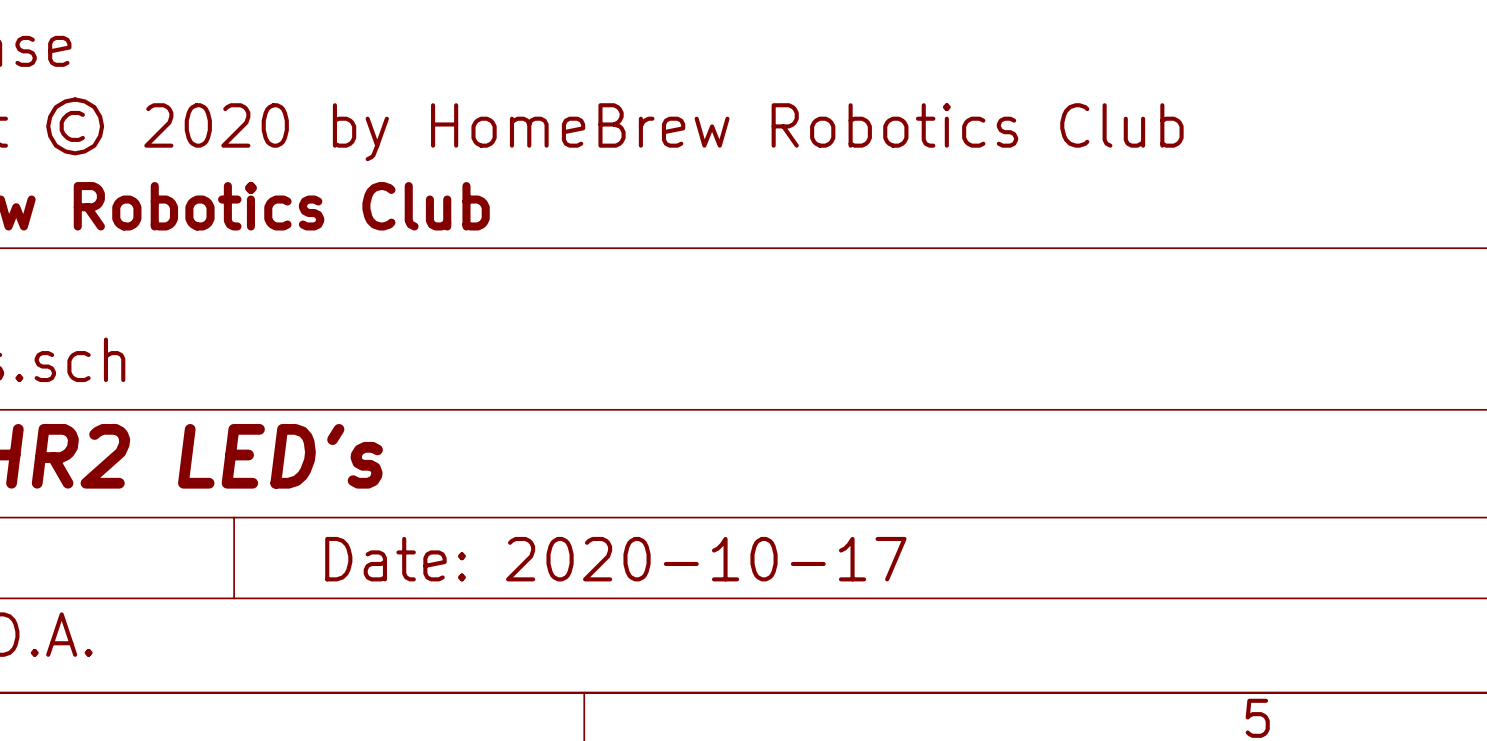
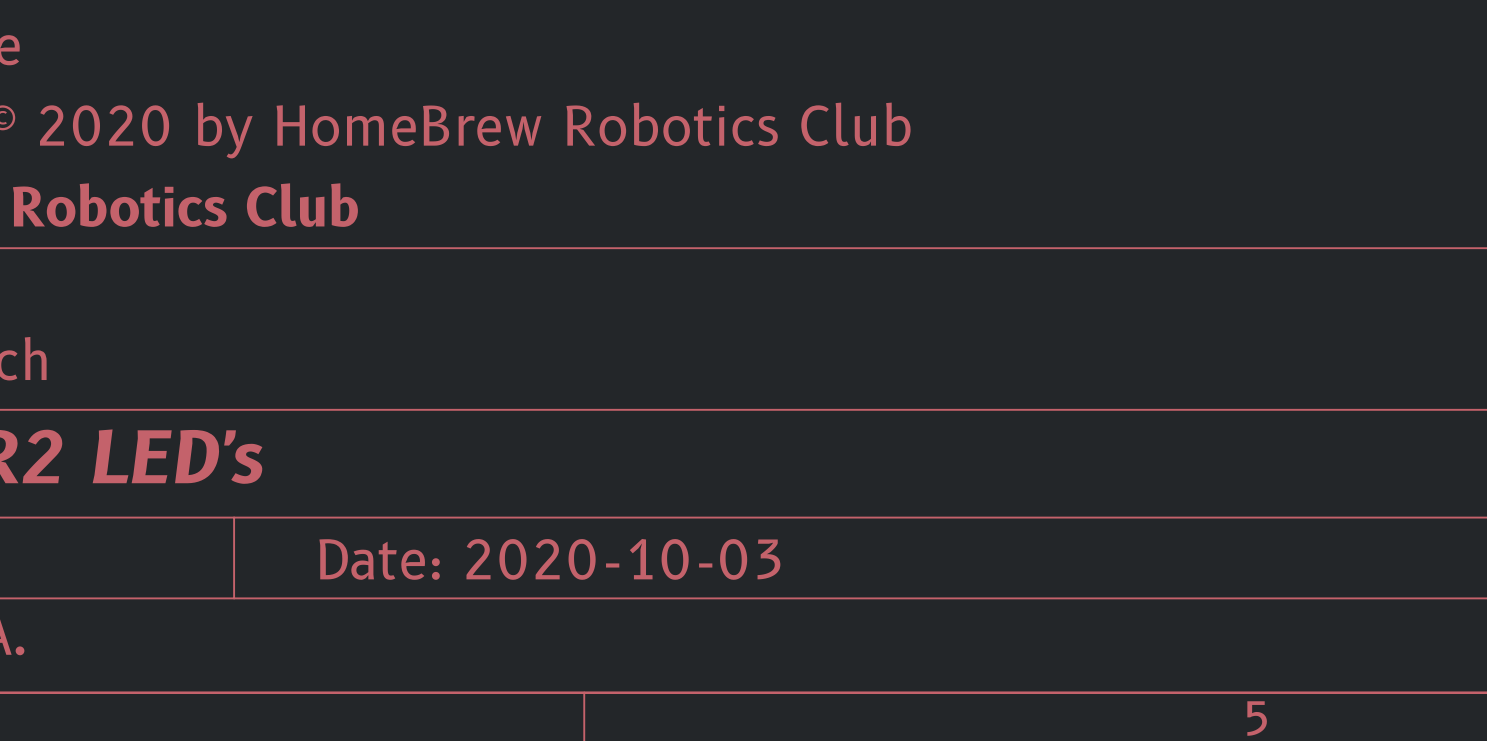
title block: Date: 2020-10-17 (615, 559) -> Date: 2020-10-03 (549, 559)

